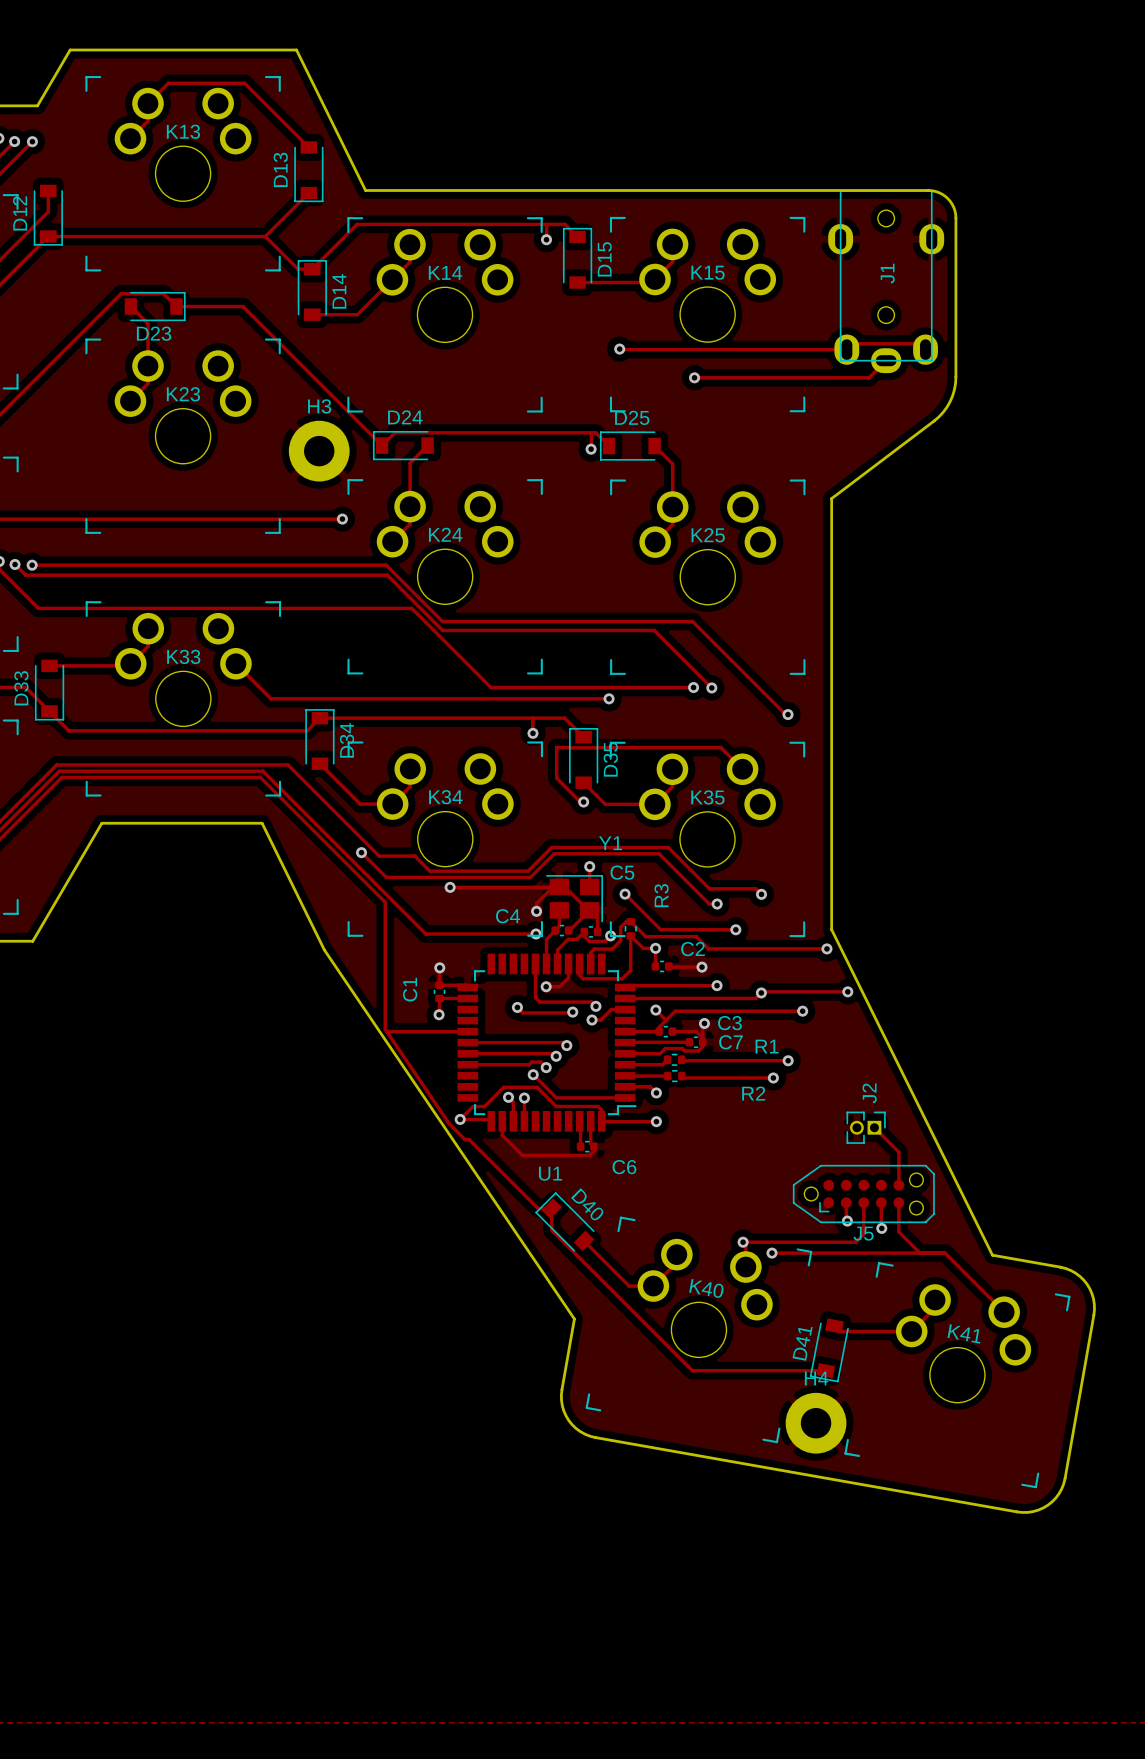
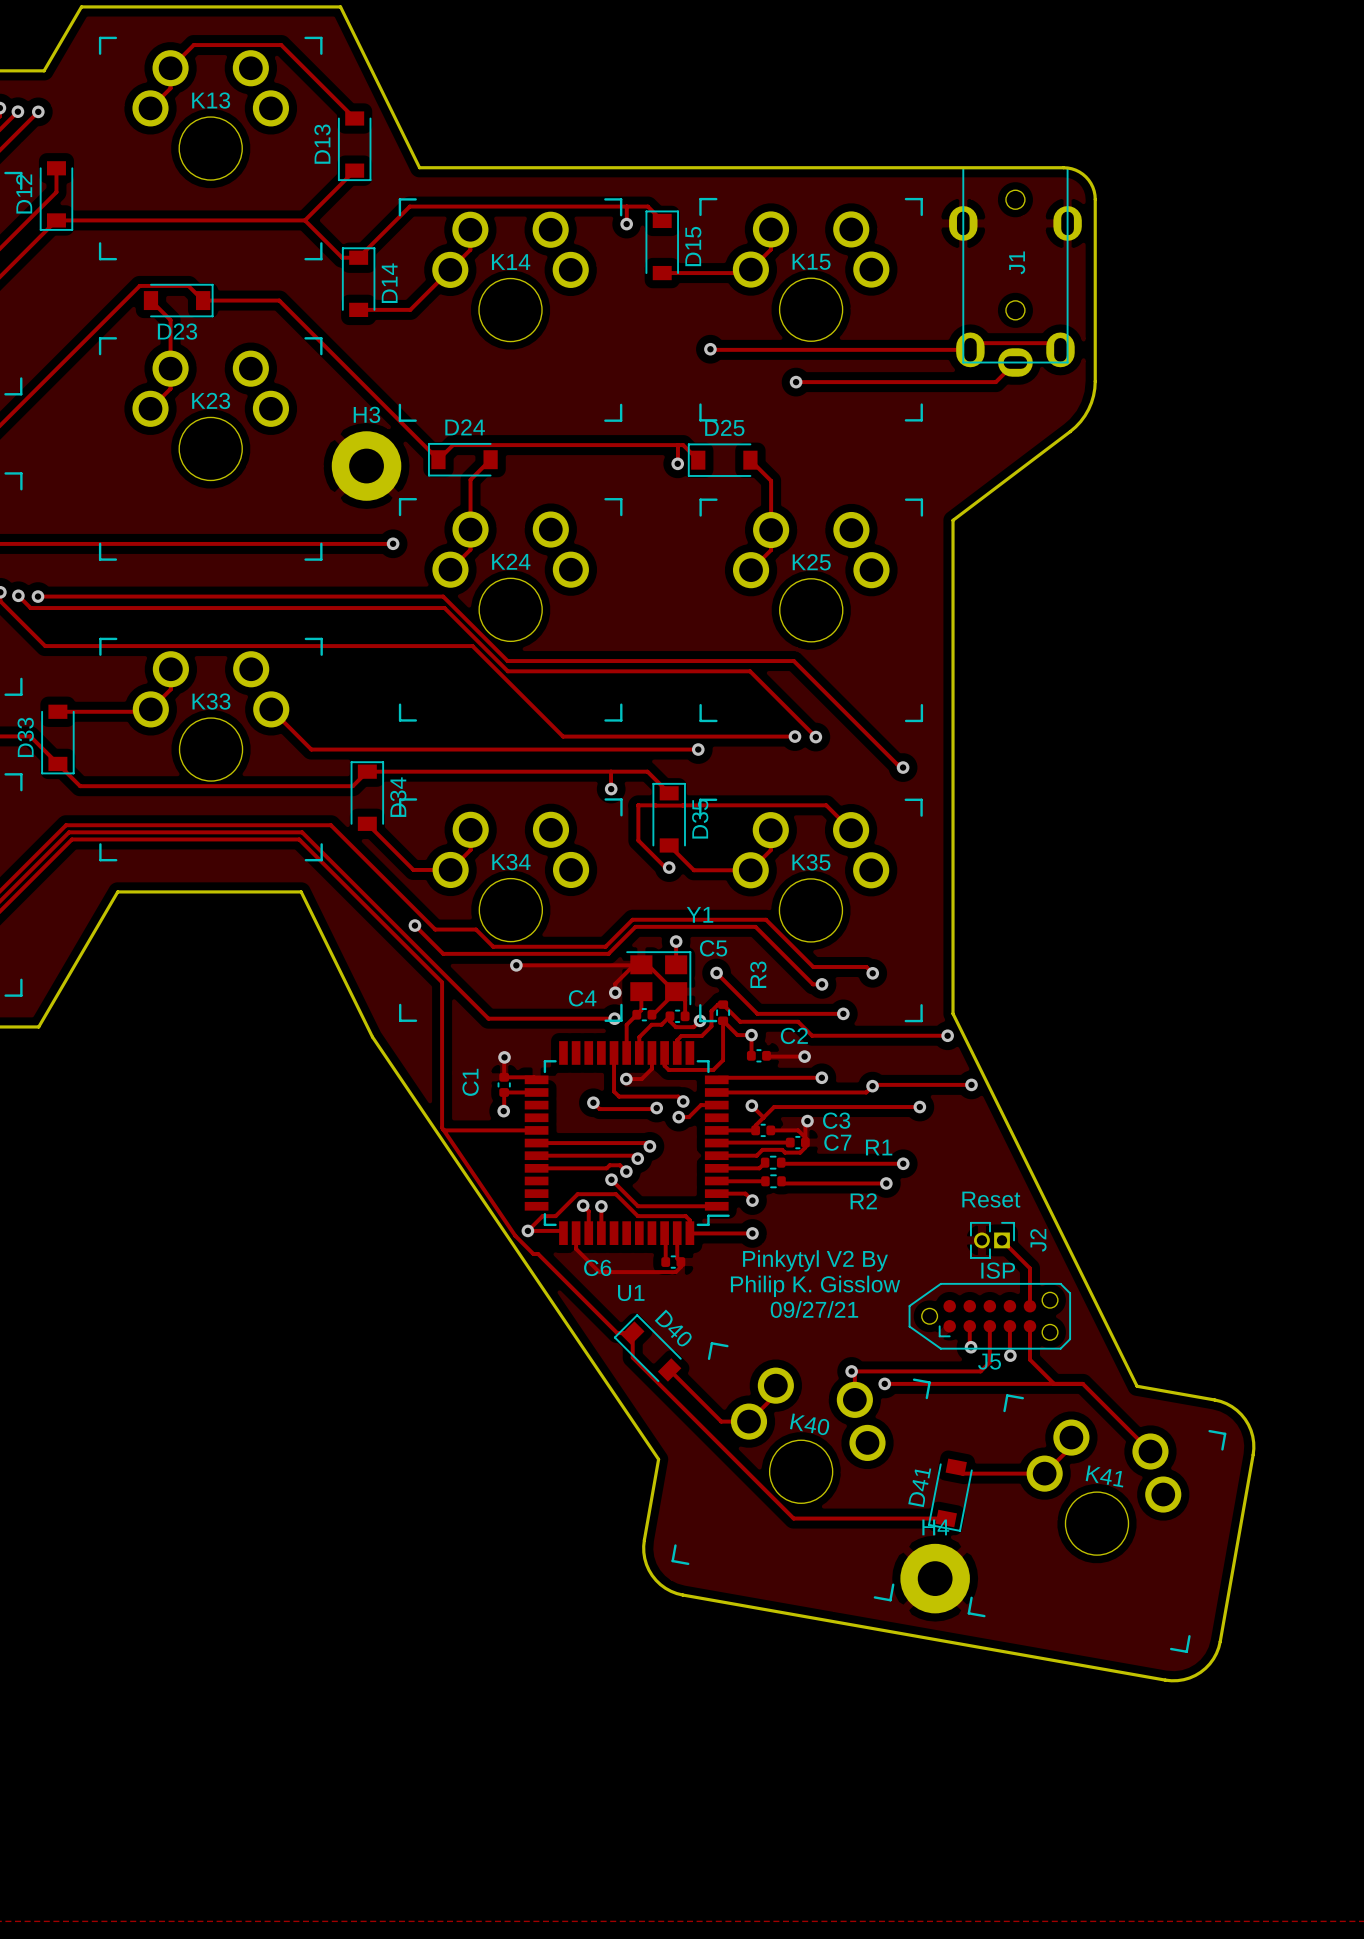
text: none -> Reset (991, 1199)
J2 name position: J2 (869, 1093) -> J2 (1038, 1240)
text: none -> Pinkytyl V2 By (815, 1260)
text: none -> ISP (998, 1270)
C6 name position: C6 (624, 1167) -> C6 (597, 1267)
text: none -> Philip K. Gisslow (815, 1286)
text: none -> 09/27/21 (814, 1309)

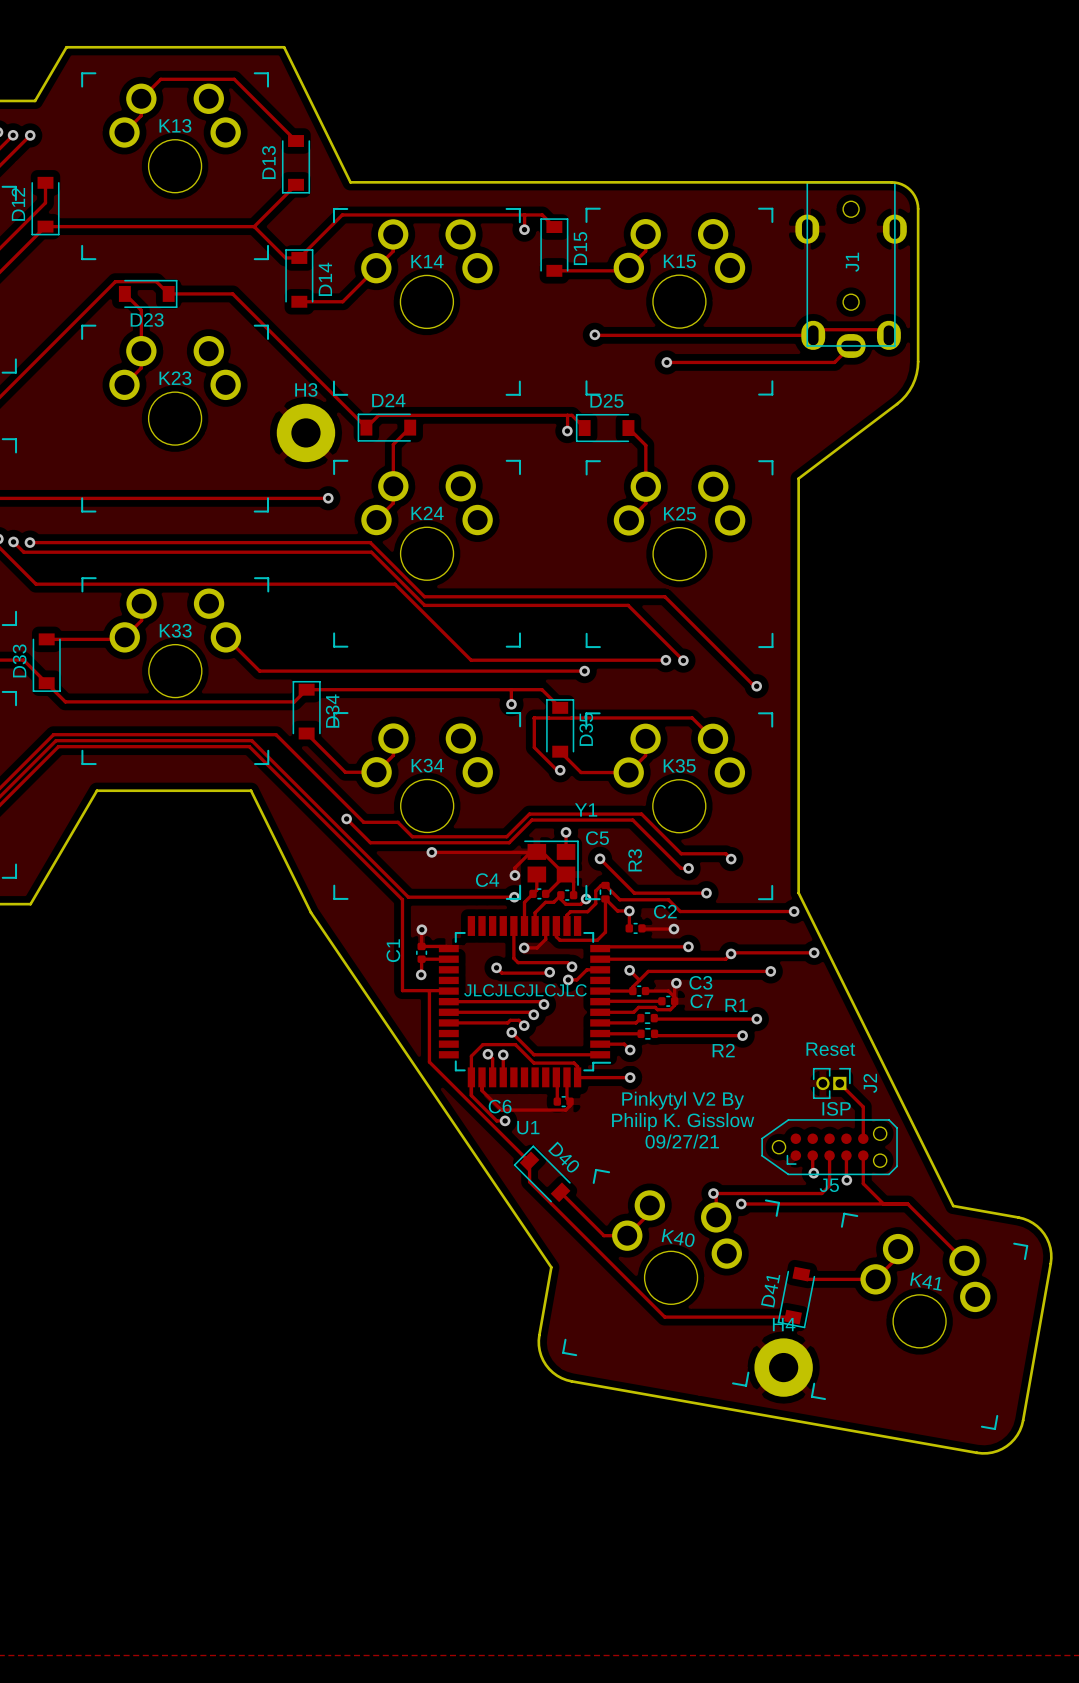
track: (442, 982) (442, 1127) (515, 1235) (533, 1254) (538, 1254) (617, 1333) (631, 1333) -> (429, 990) (429, 1062) (528, 1161)
track: (443, 1129) (536, 1130) -> (369, 866) (402, 899) (402, 990) (448, 991)
text: none -> JLCJLCJLCJLC (525, 990)
track: (577, 1194) (555, 1216) (542, 1216) (527, 1230) (561, 1230) (563, 1233) -> (483, 1044) (471, 1056) (471, 1095) (496, 1120) (505, 1120)
via position: (527, 1230) -> (505, 1120)

